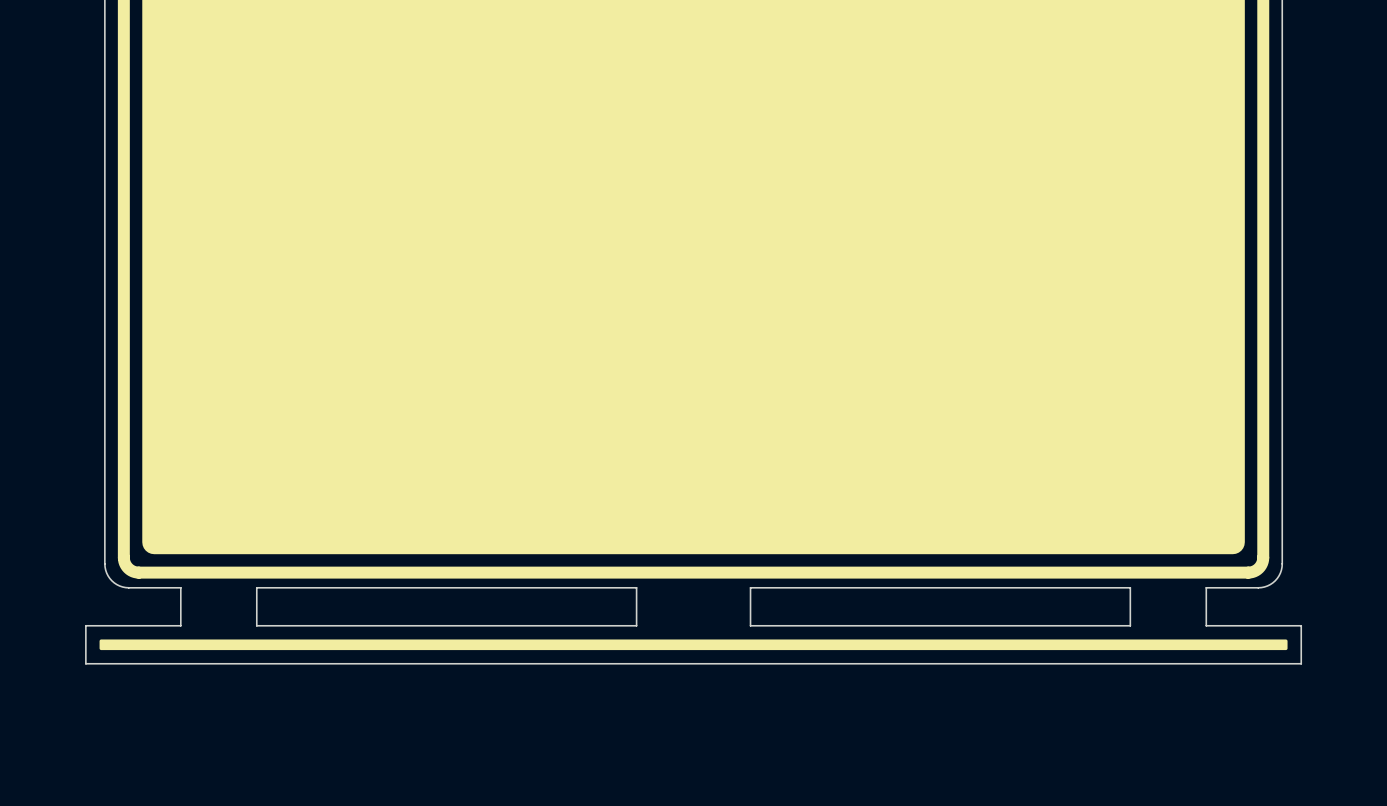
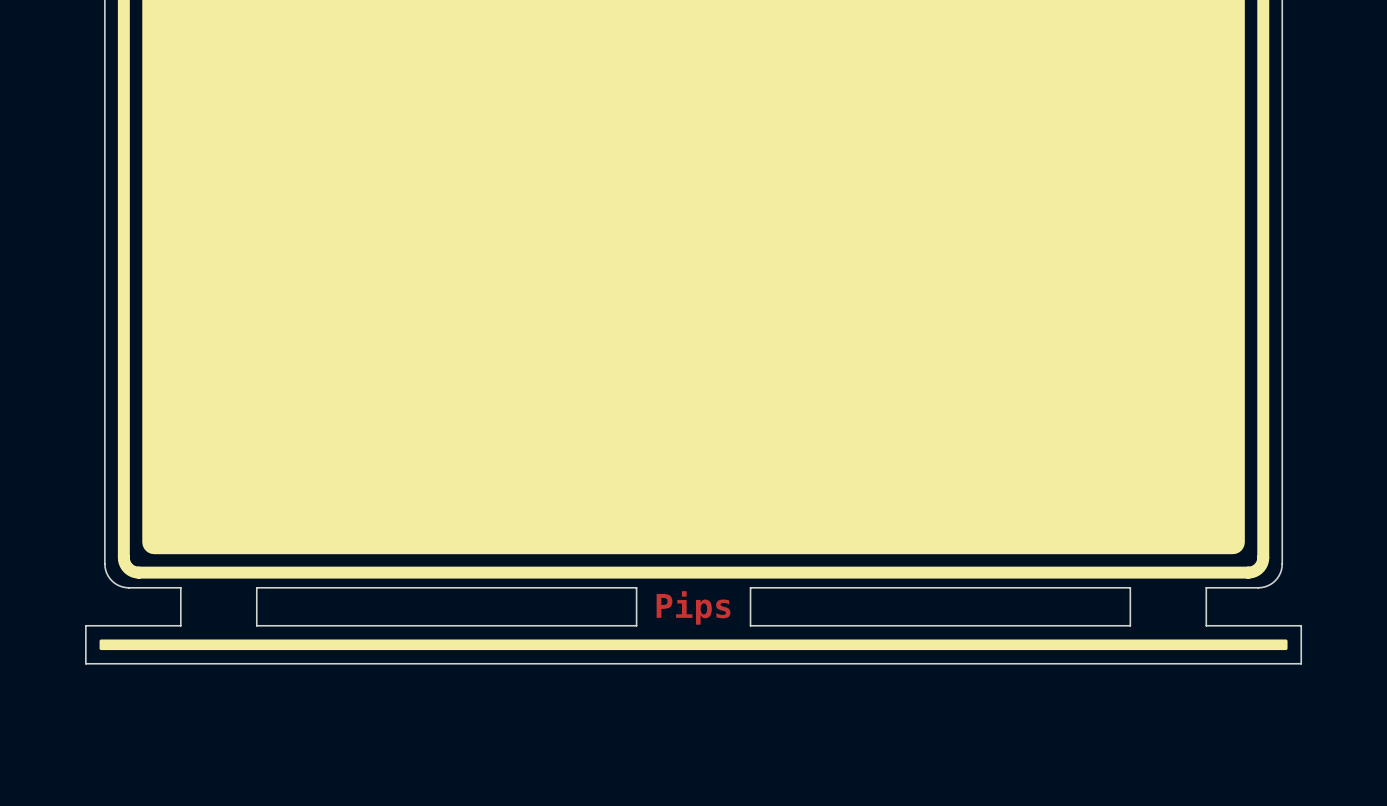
text: none -> Pips (693, 607)

